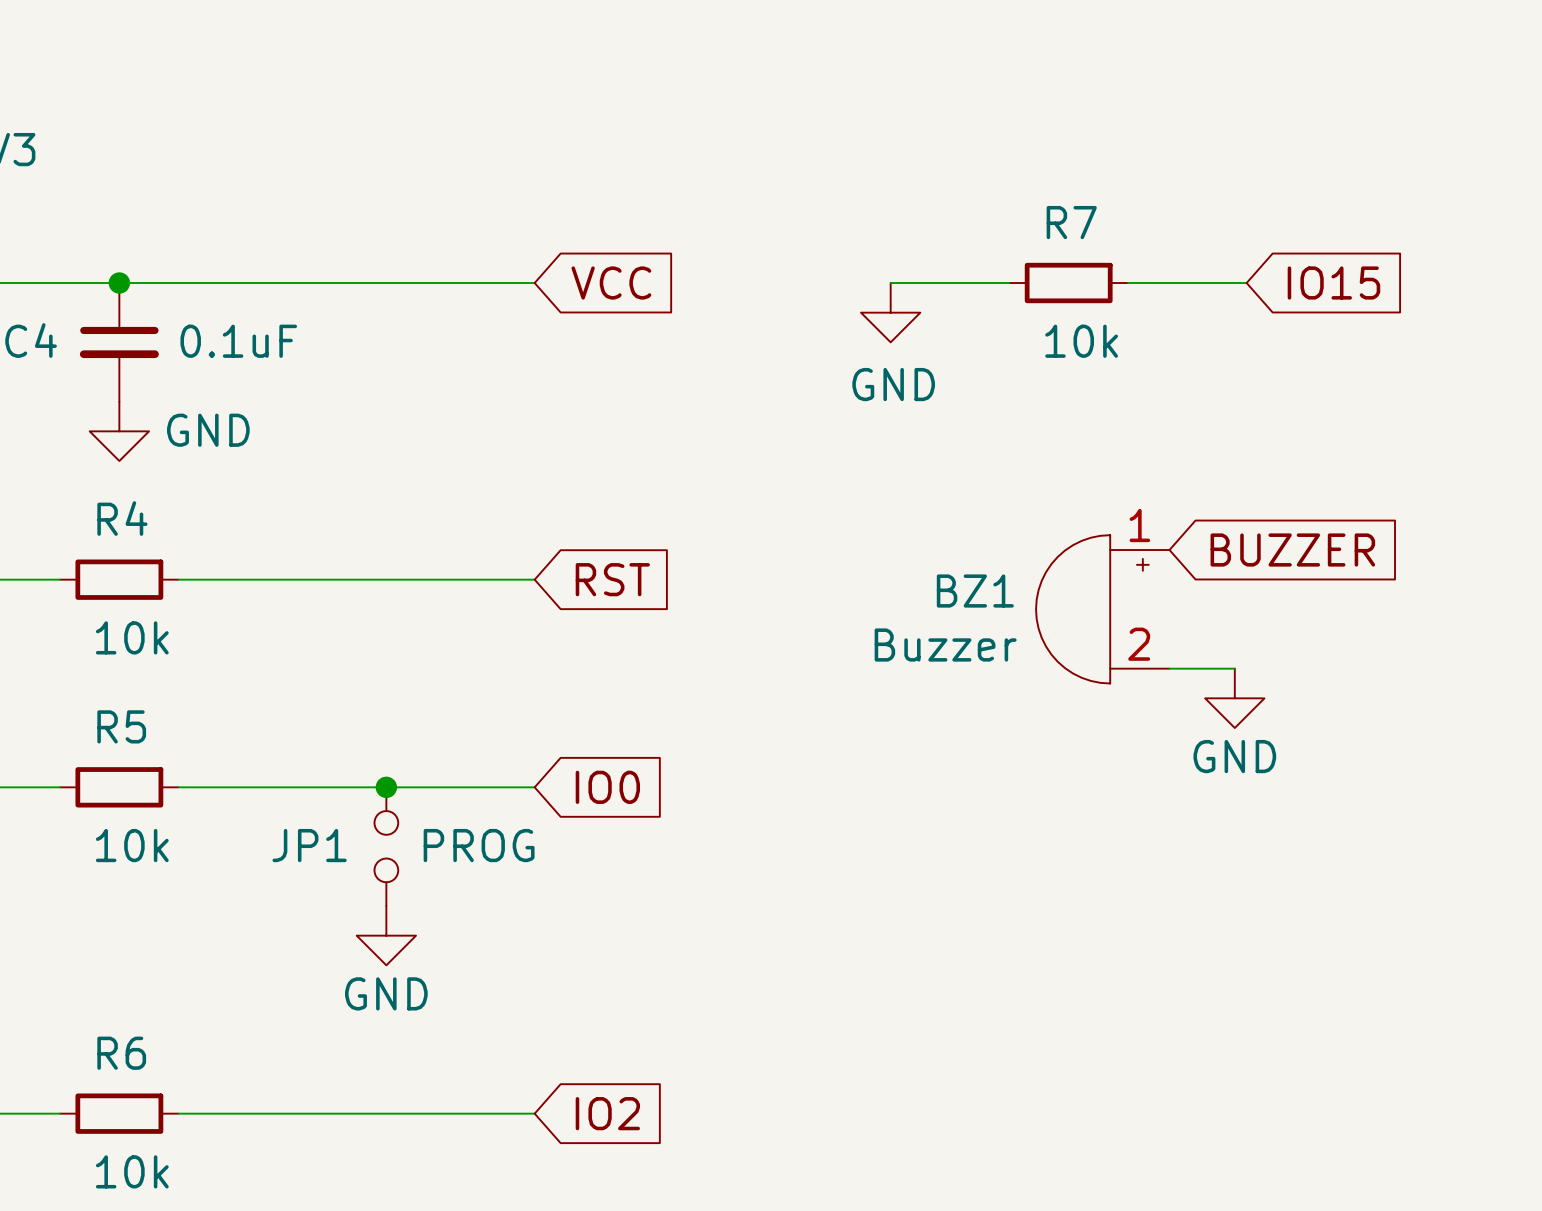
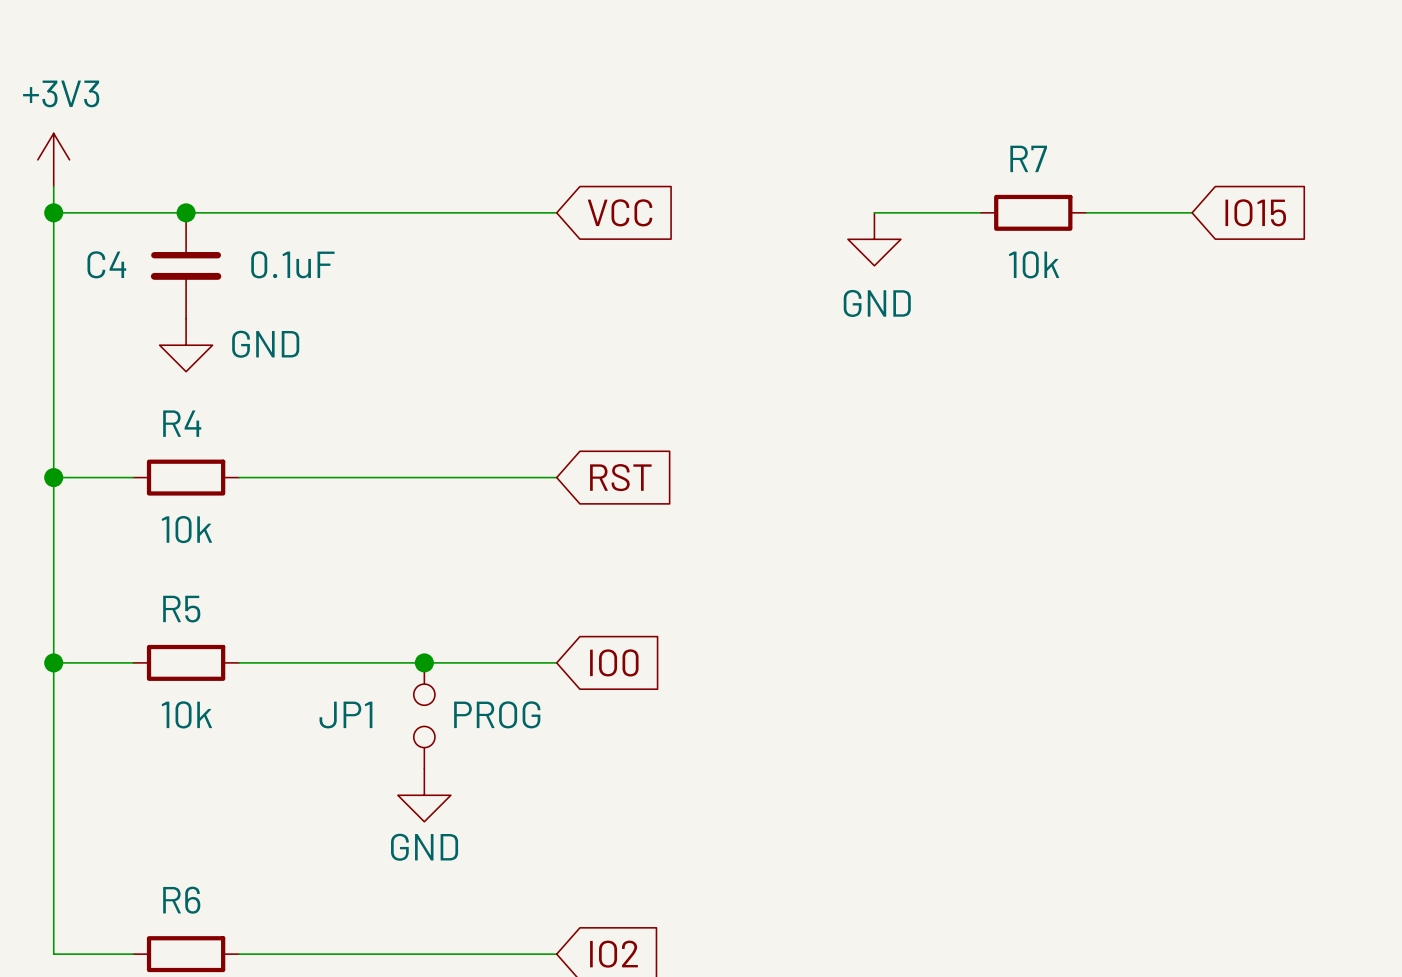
global label: BUZZER (1292, 550) -> none
BZ1: Buzzer (1102, 609) -> none
wire: (1169, 668) (1234, 668) -> none
power symbol: GND (1234, 698) -> none

